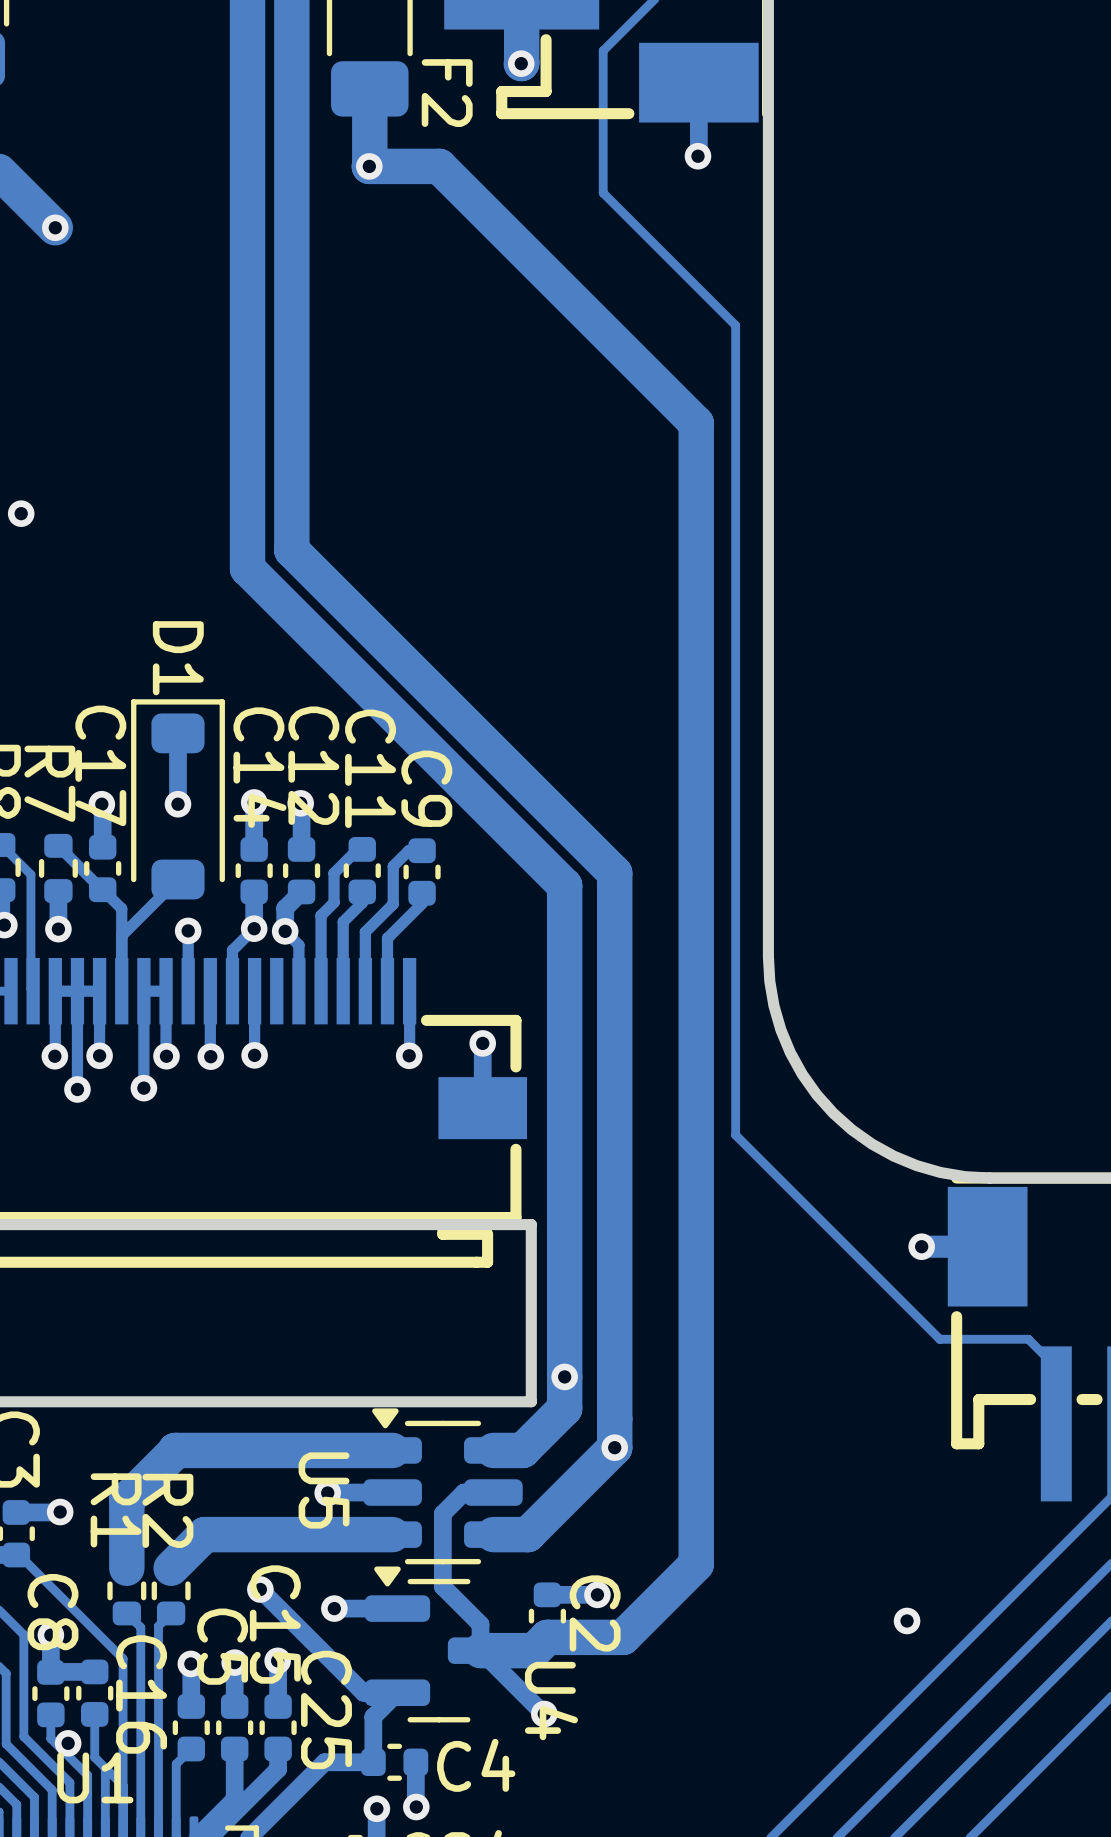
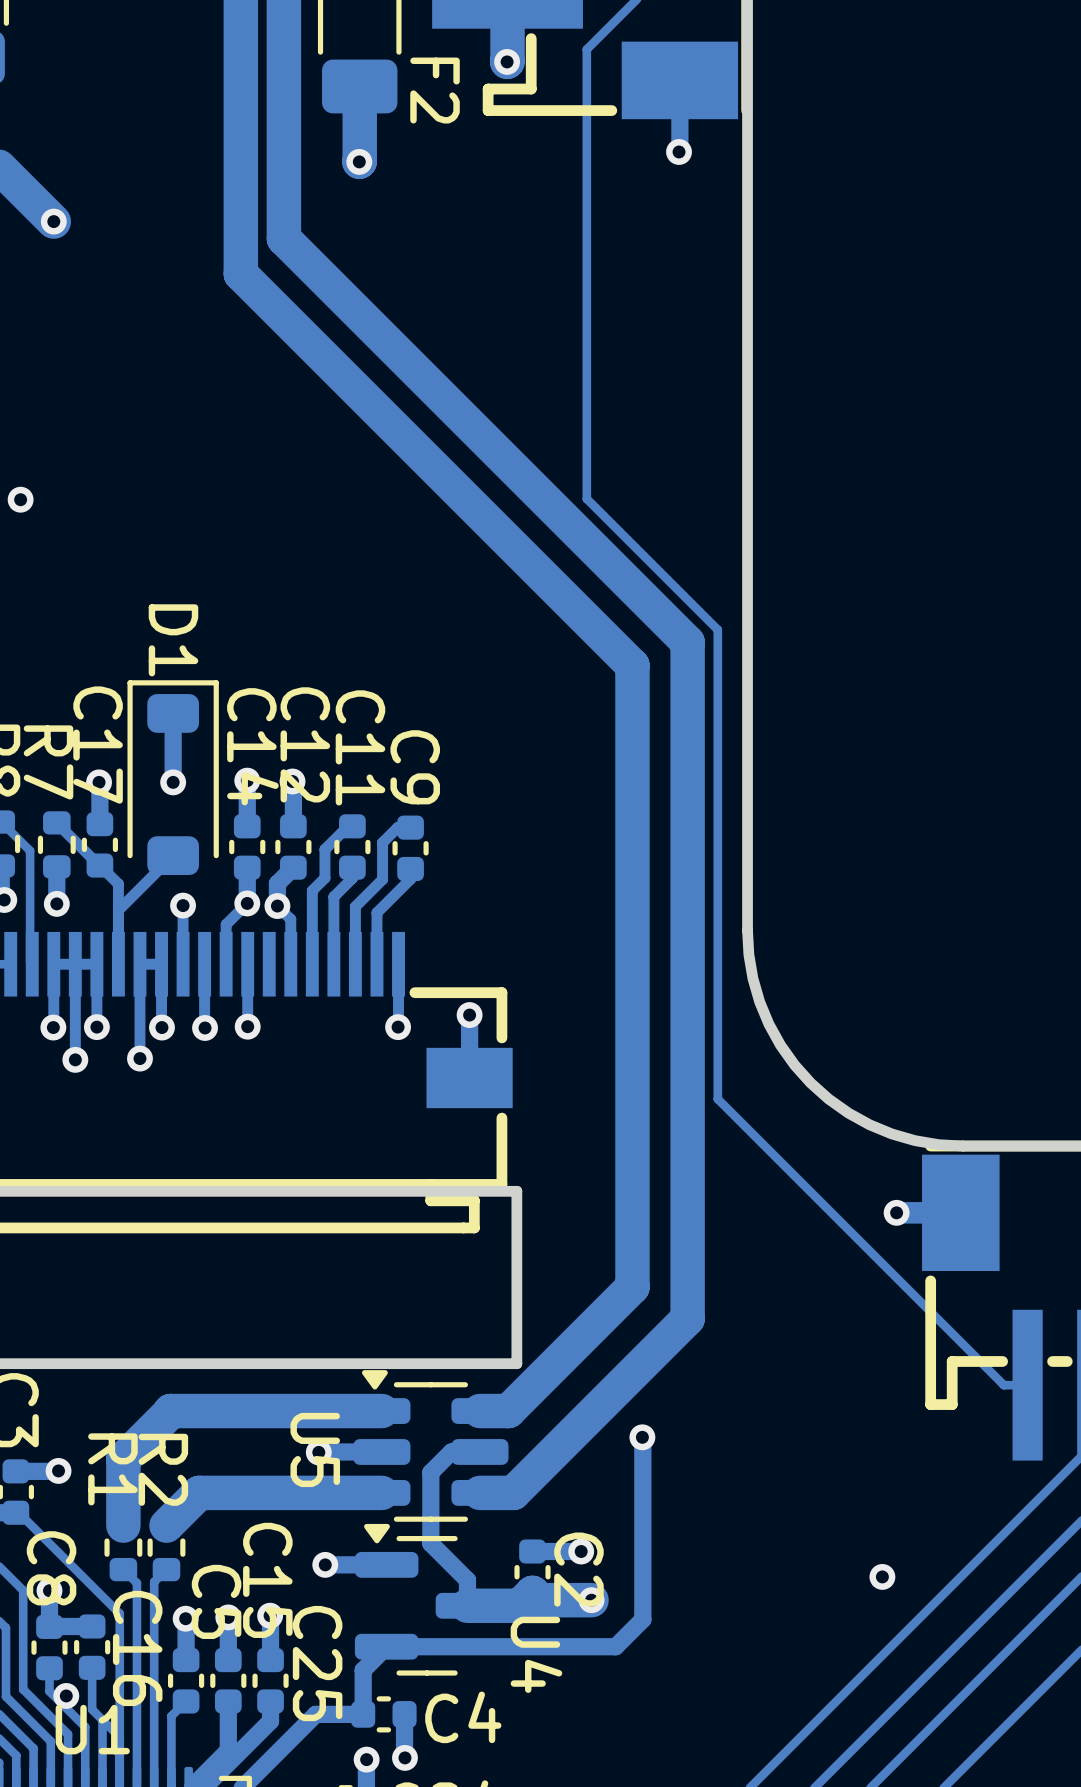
track: (369, 166) (439, 166) (696, 423) (696, 1564) (623, 1637) (547, 1637) -> (591, 1600) (539, 1600) (532, 1592)
track: (603, 192) (735, 325) (735, 1135) (939, 1339) (1028, 1339) (1056, 1367) (1056, 1423) -> (586, 187) (586, 498) (717, 629) (717, 1099) (1003, 1385) (1027, 1385)
track: (291, 245) (291, 550) (614, 873) (614, 1447) -> (283, 238) (687, 642) (687, 1318) (598, 1408)
track: (247, 281) (247, 568) (564, 885) (564, 1408) -> (240, 273) (632, 665) (632, 1287) (549, 1370)
via: (564, 1376) -> none
via position: (614, 1447) -> (642, 1437)
track: (260, 1589) (363, 1692) (397, 1692) -> (642, 1437) (642, 1619) (615, 1646) (386, 1646)
via: (260, 1589) -> none
track: (480, 1650) (543, 1713) -> none
via position: (544, 1713) -> (591, 1600)

